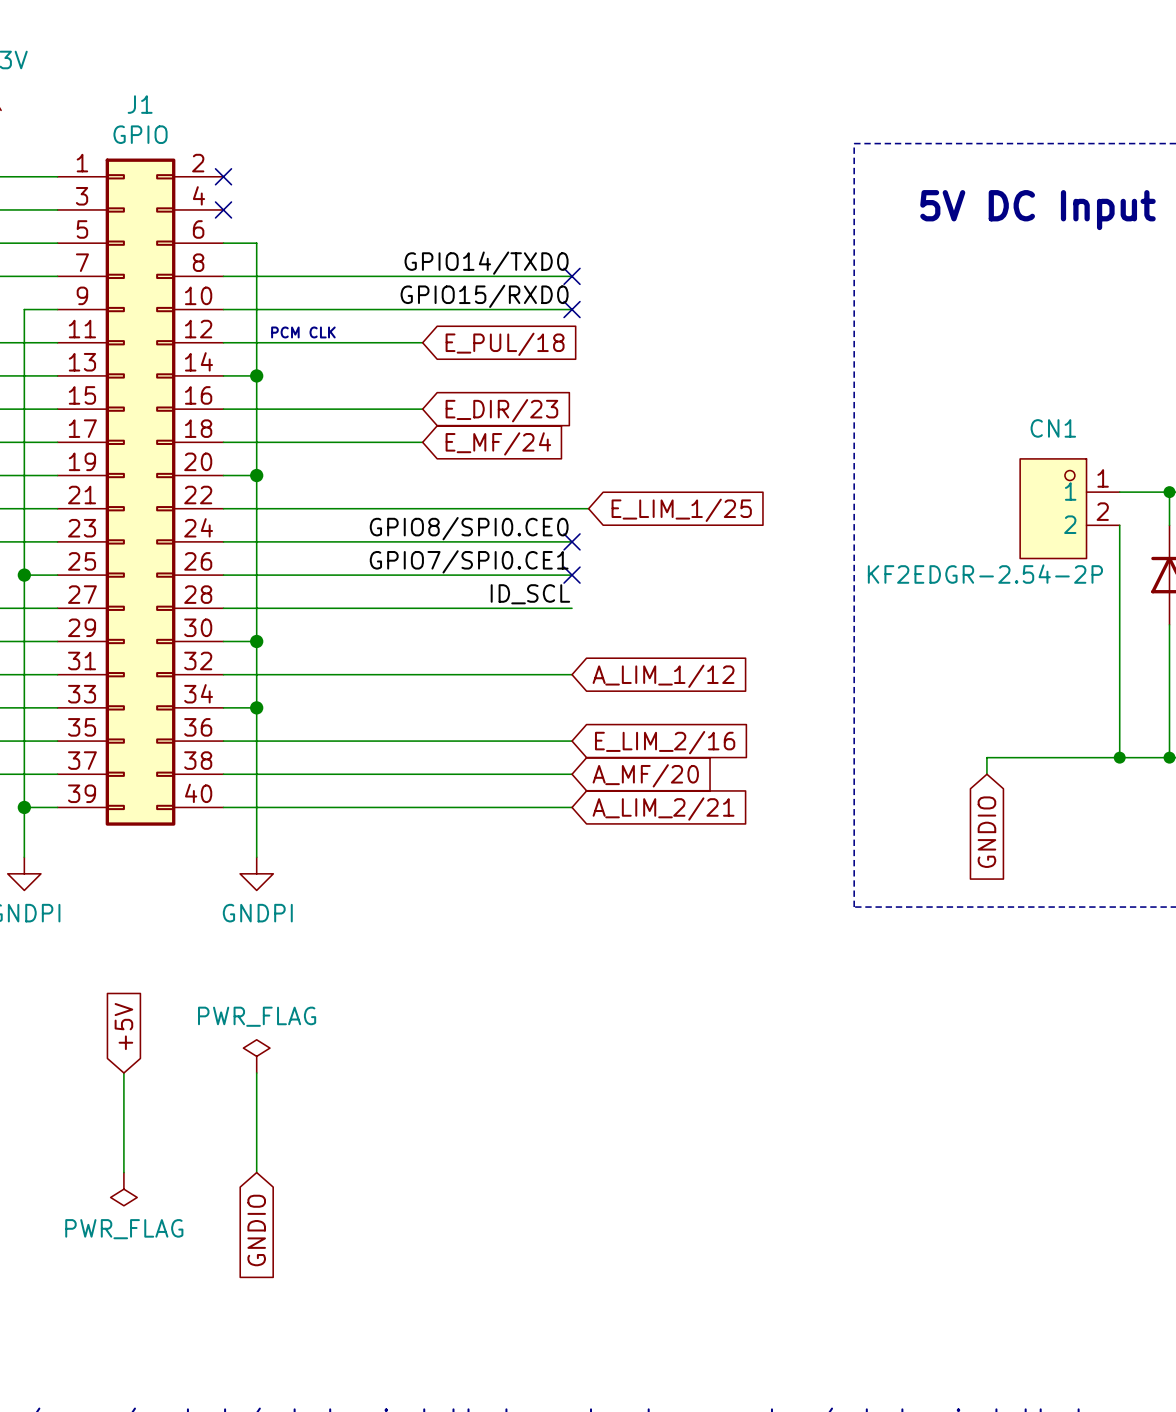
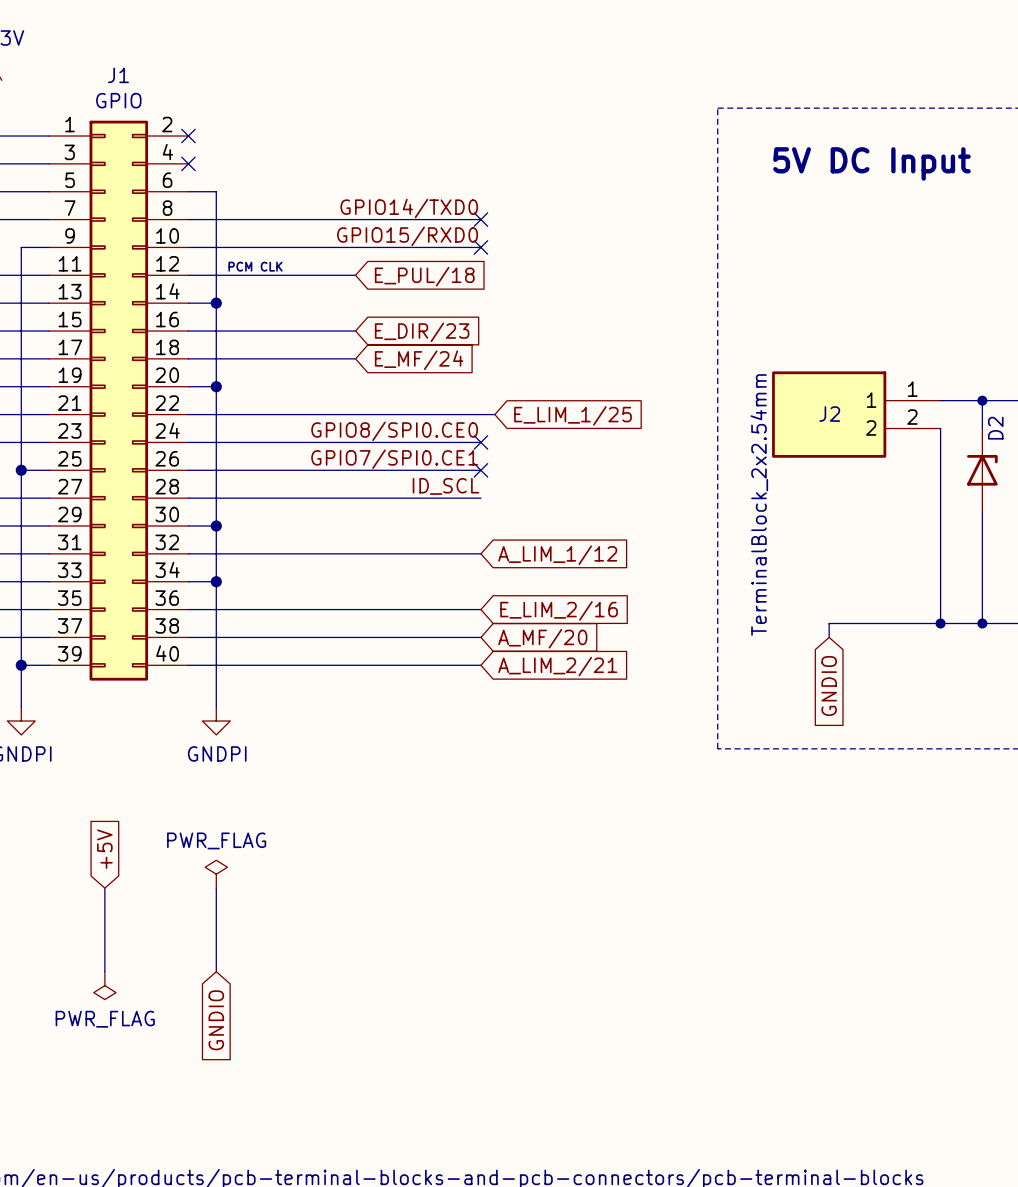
J2: none -> TerminalBlock_2x2.54mm (856, 414)
CN1: KF2EDGR-2.54-2P (1069, 508) -> none

